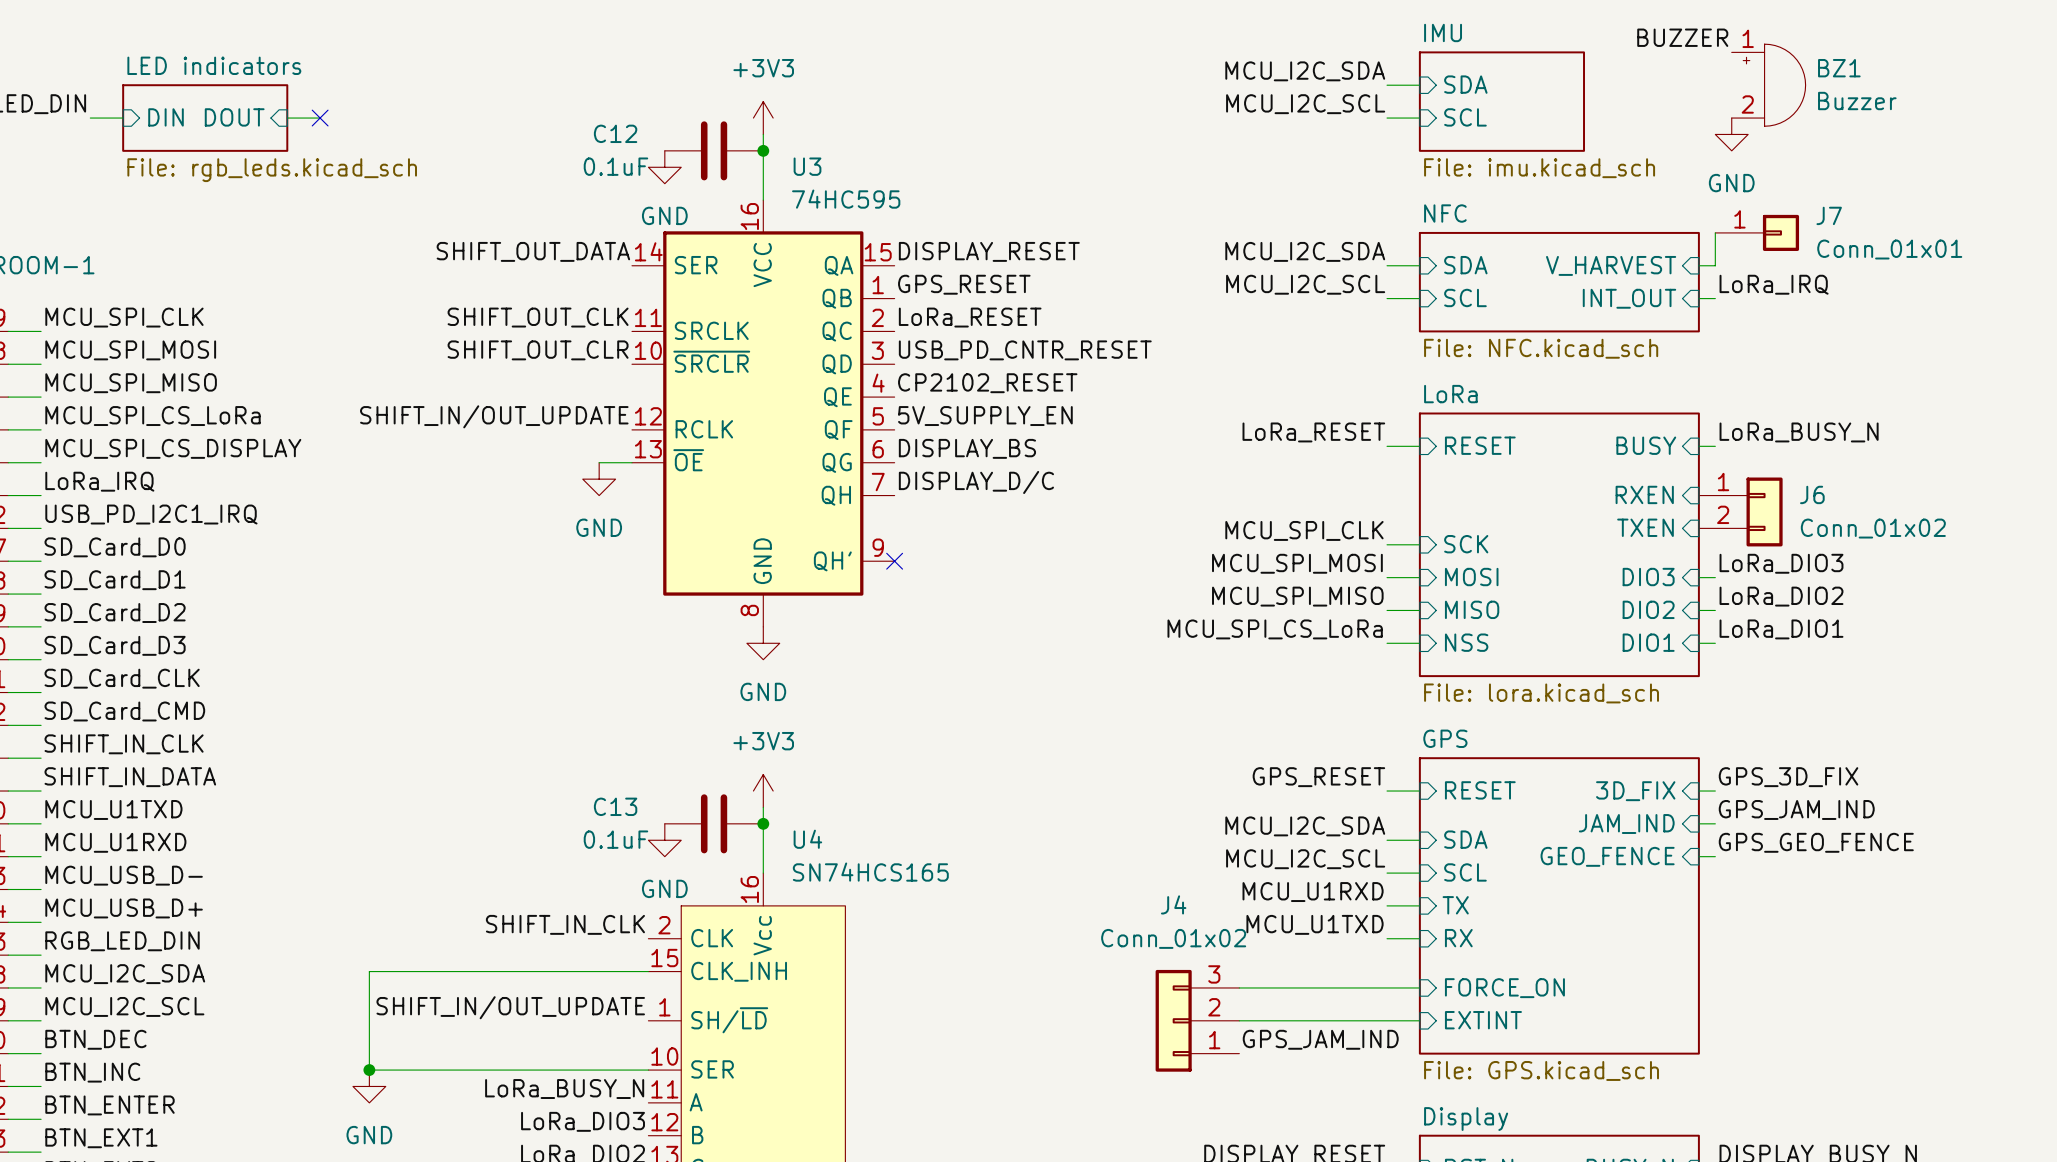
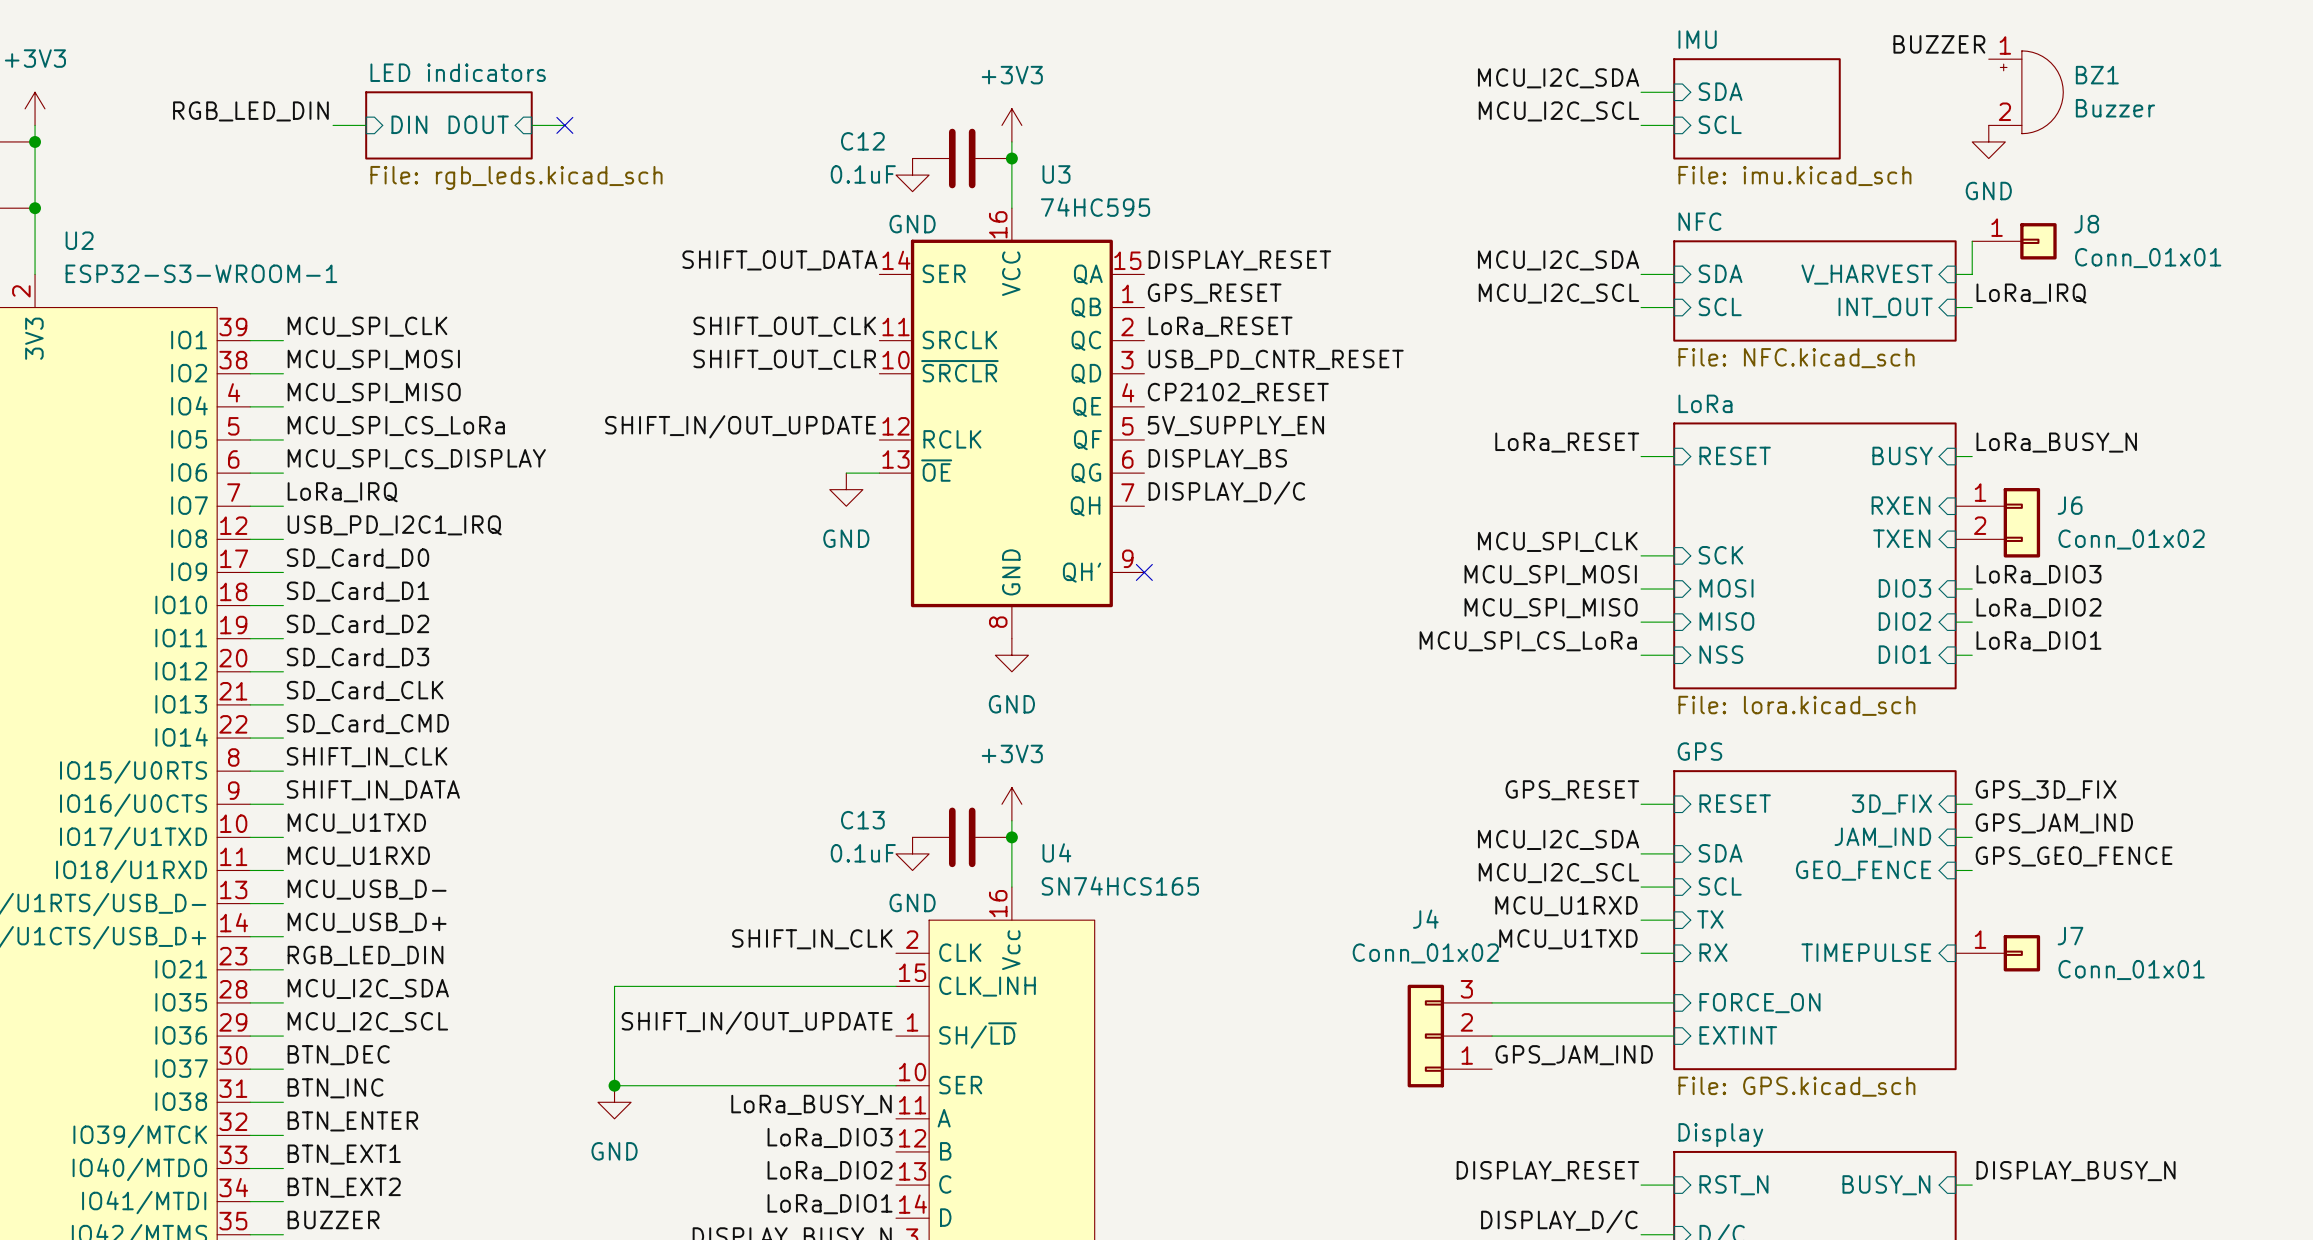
J7 name: J7 (1829, 215) -> J8 (2086, 224)
sheet pin: none -> TIMEPULSE (1866, 952)
J7: none -> Conn_01x01 (1997, 953)

